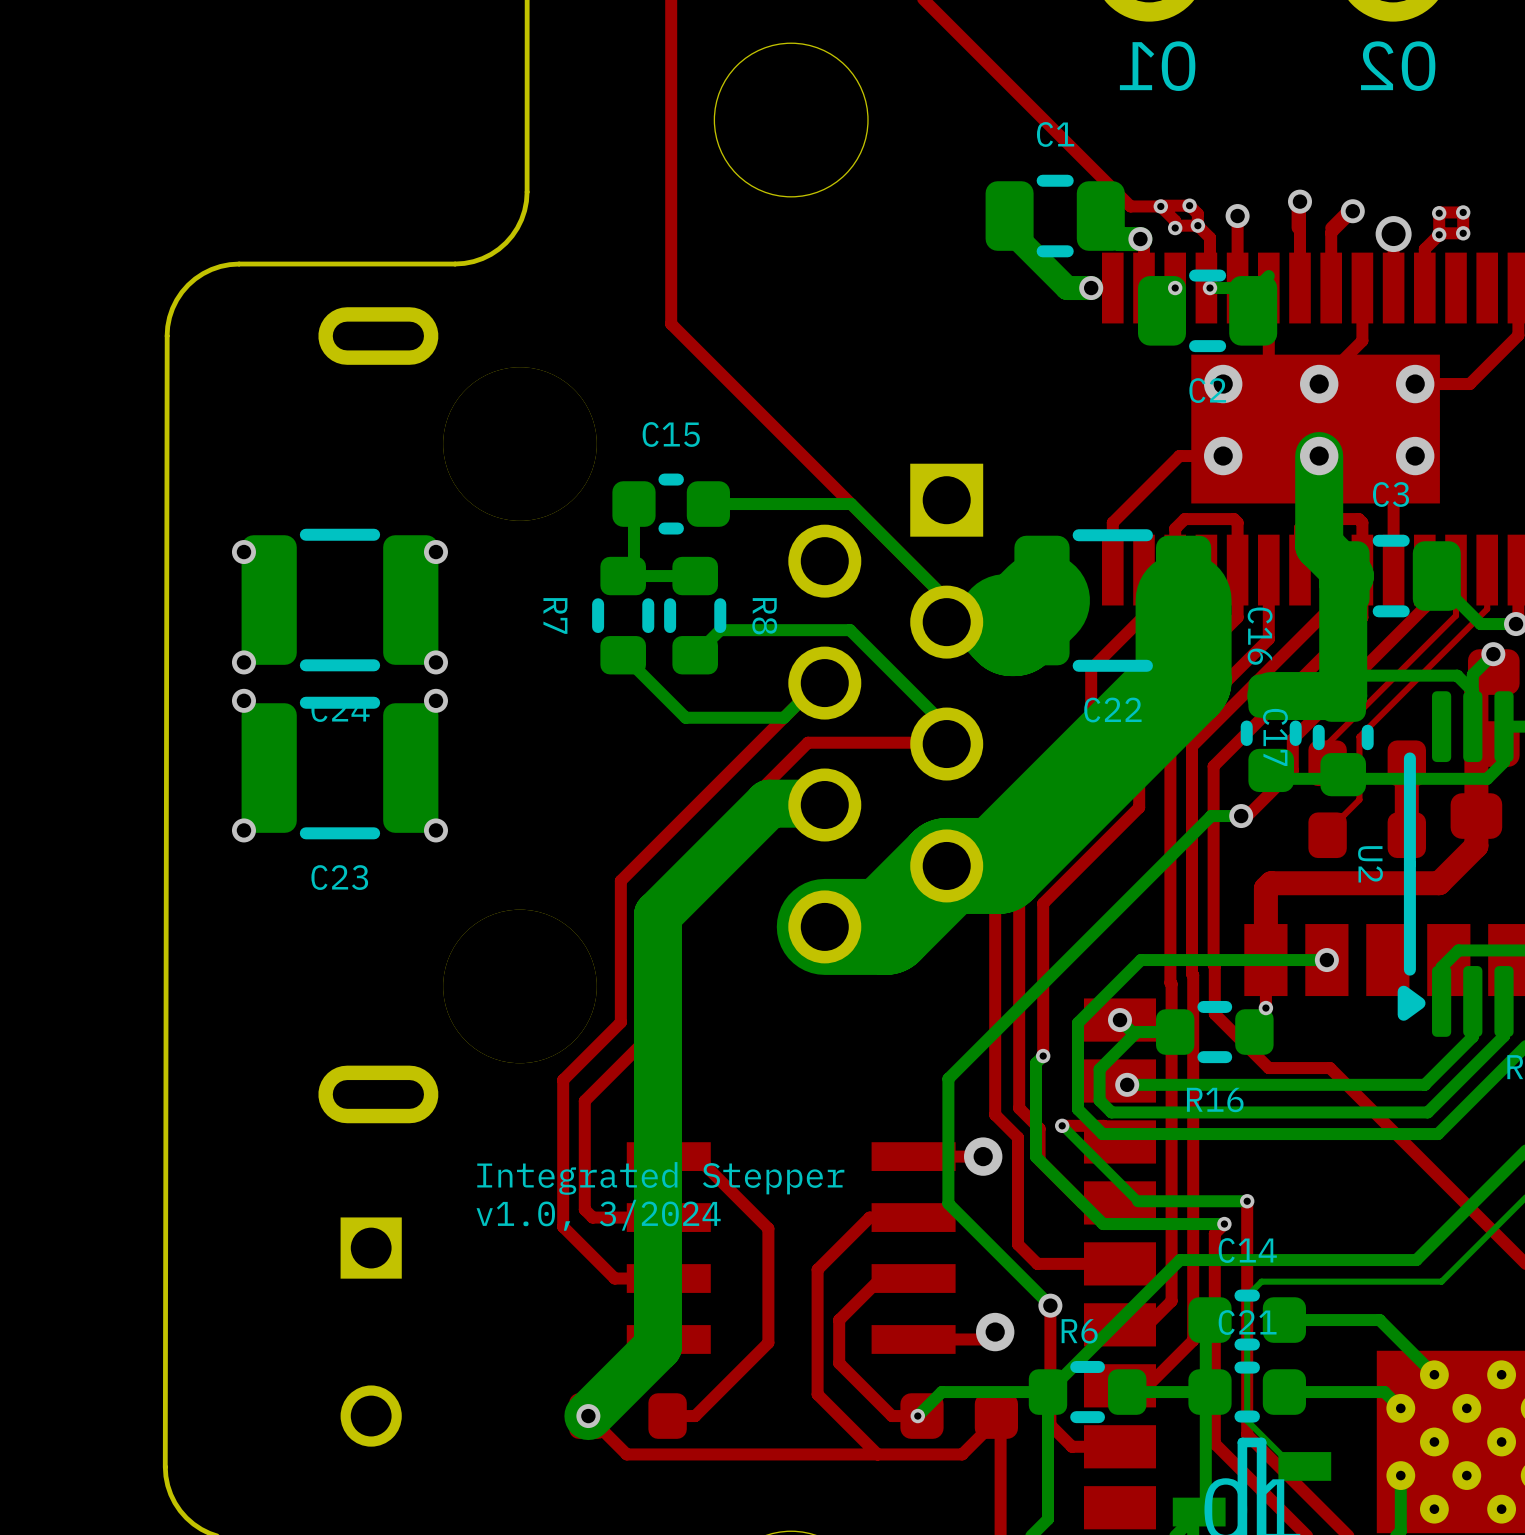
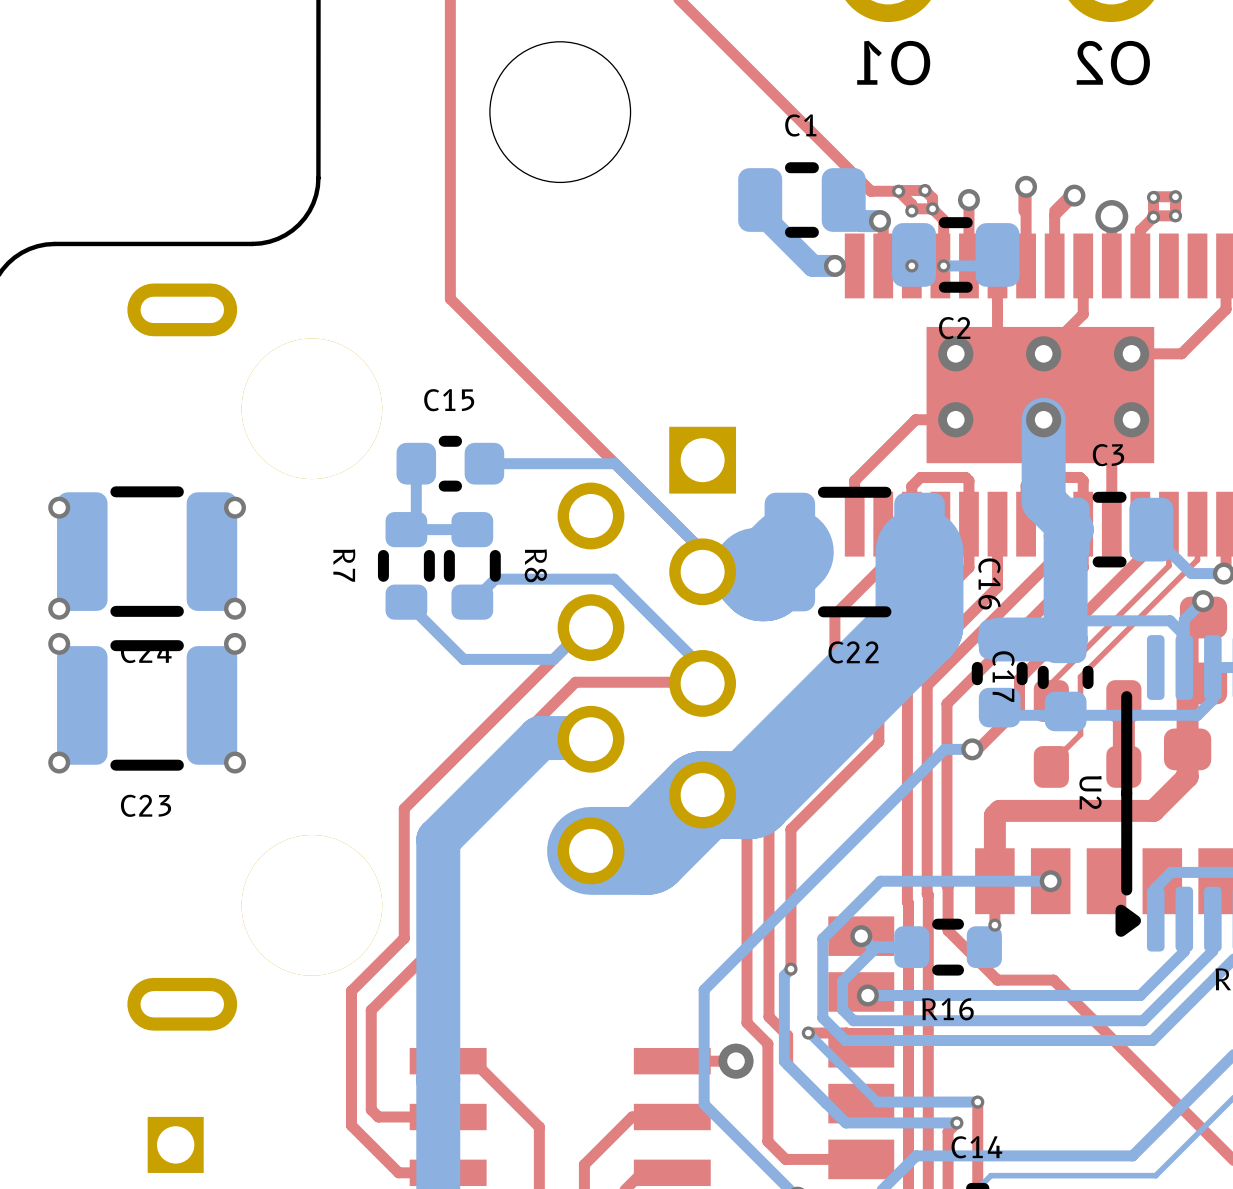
C2 position: (1207, 310) -> (955, 254)
text: Integrated Stepper (660, 1178) -> none
text: v1.0, 3/2024 (598, 1215) -> none

